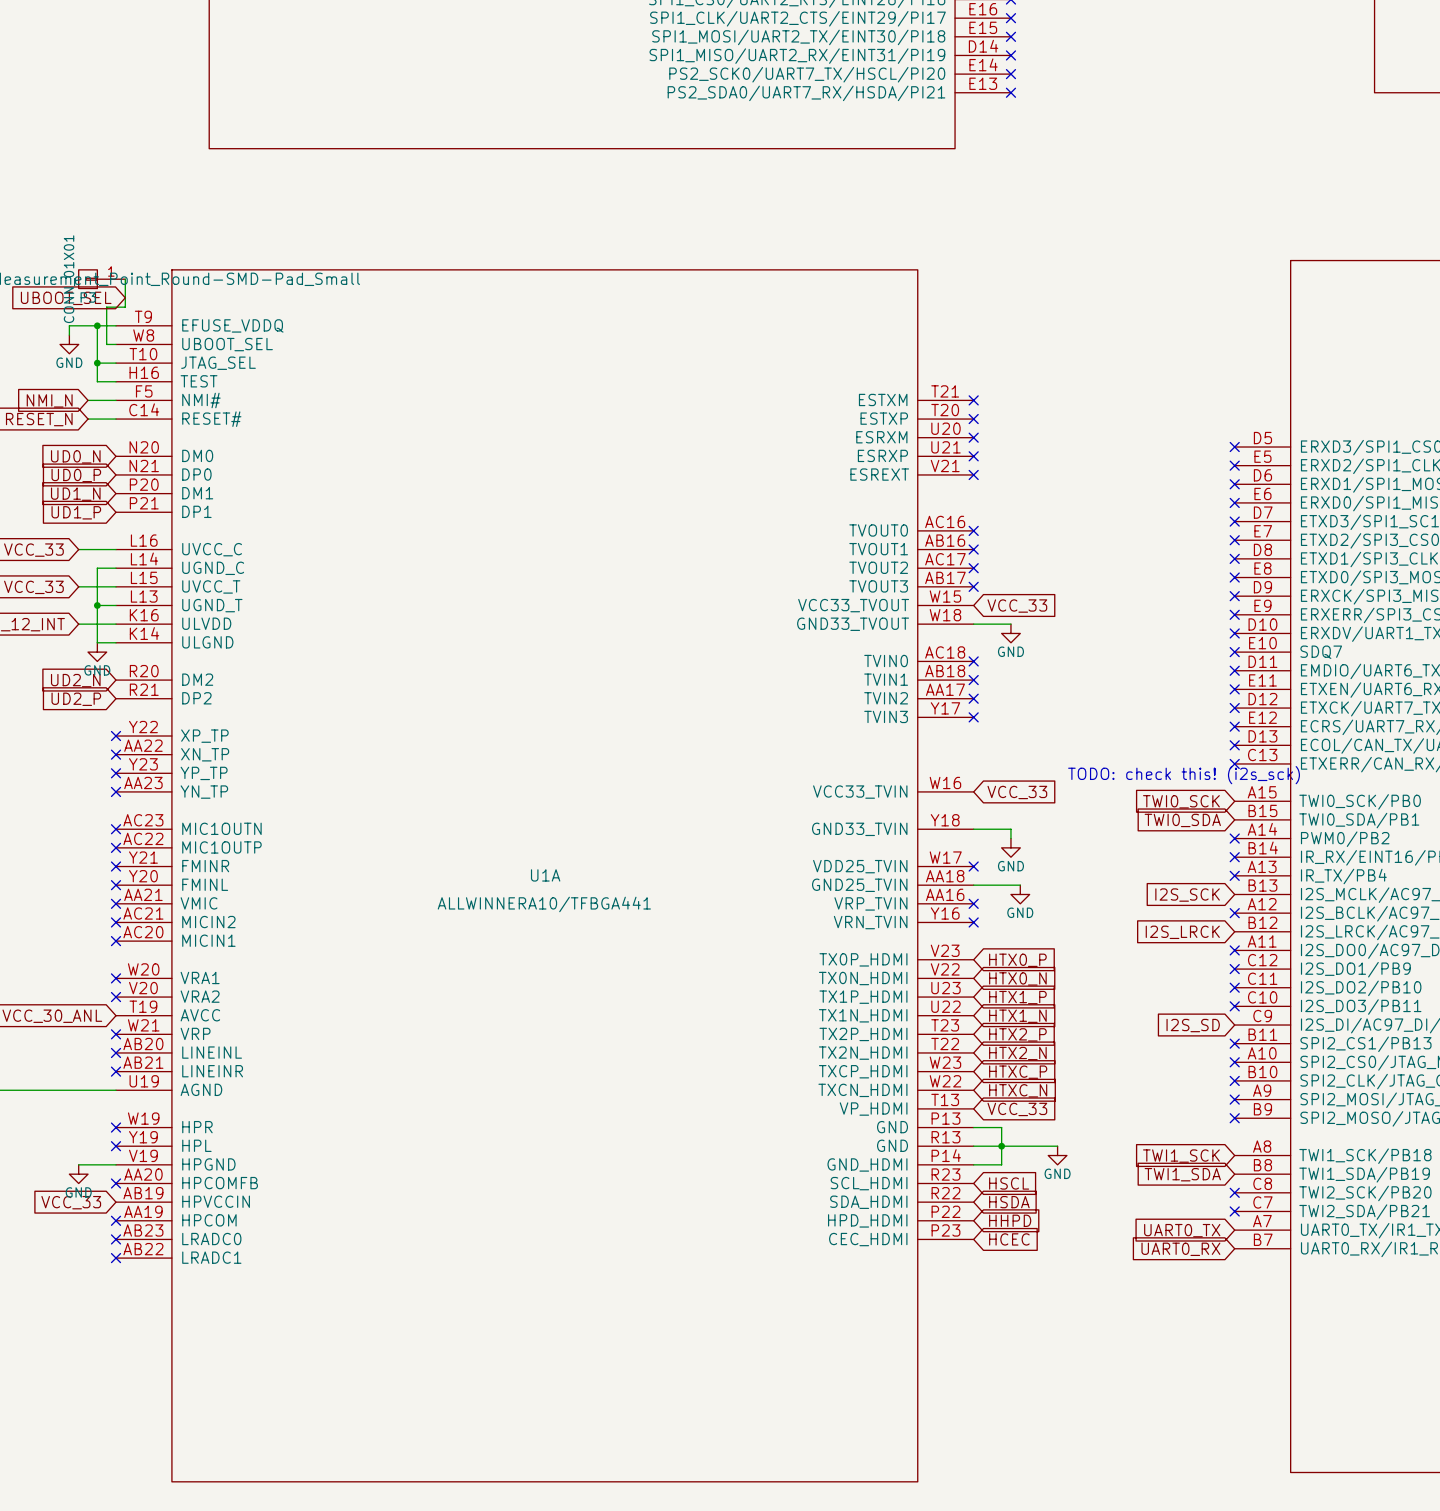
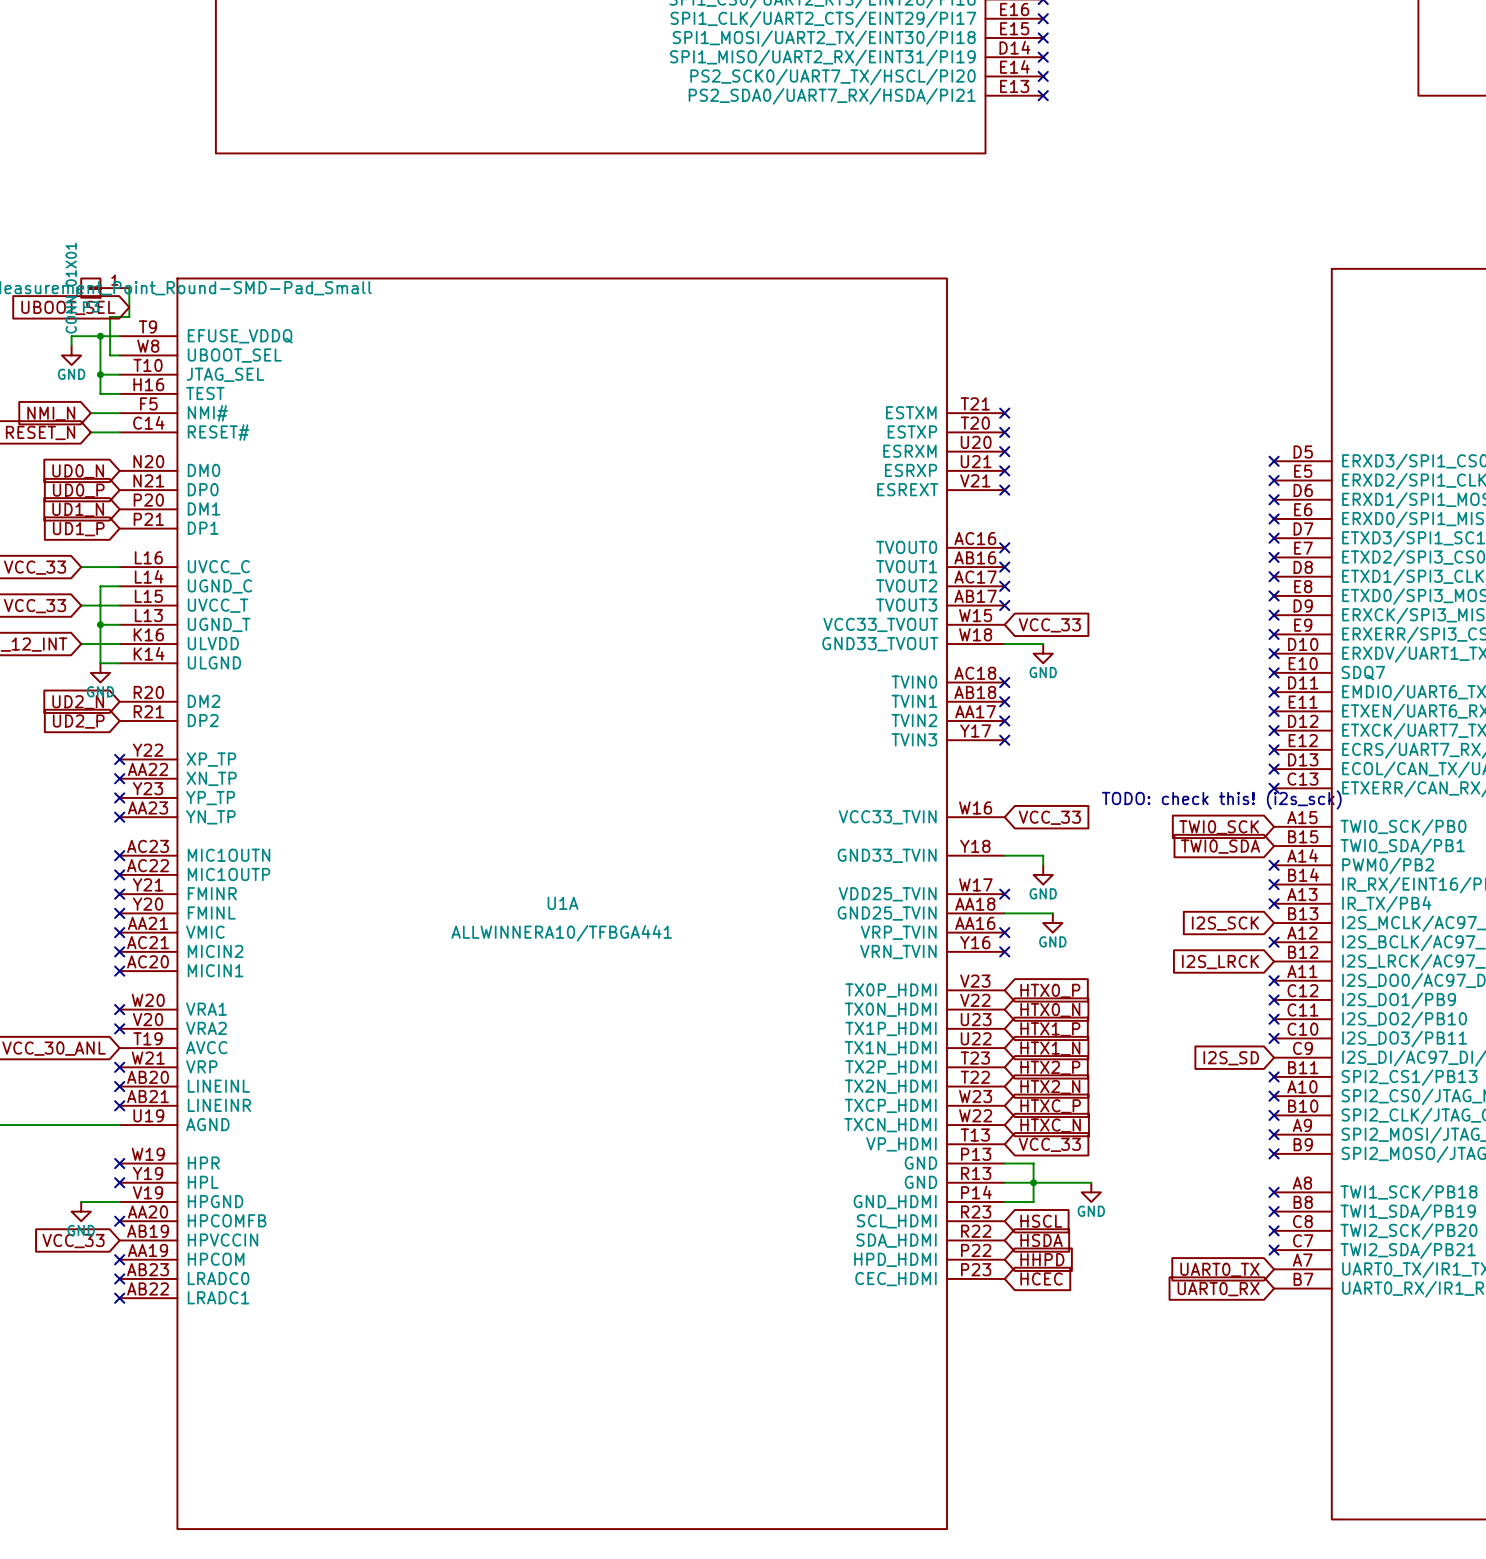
no-connect mark: none -> (1274, 1192)
global label: TWI1_SCK (1181, 1156) -> none
global label: TWI1_SDA (1182, 1174) -> none
no-connect mark: none -> (1274, 1211)

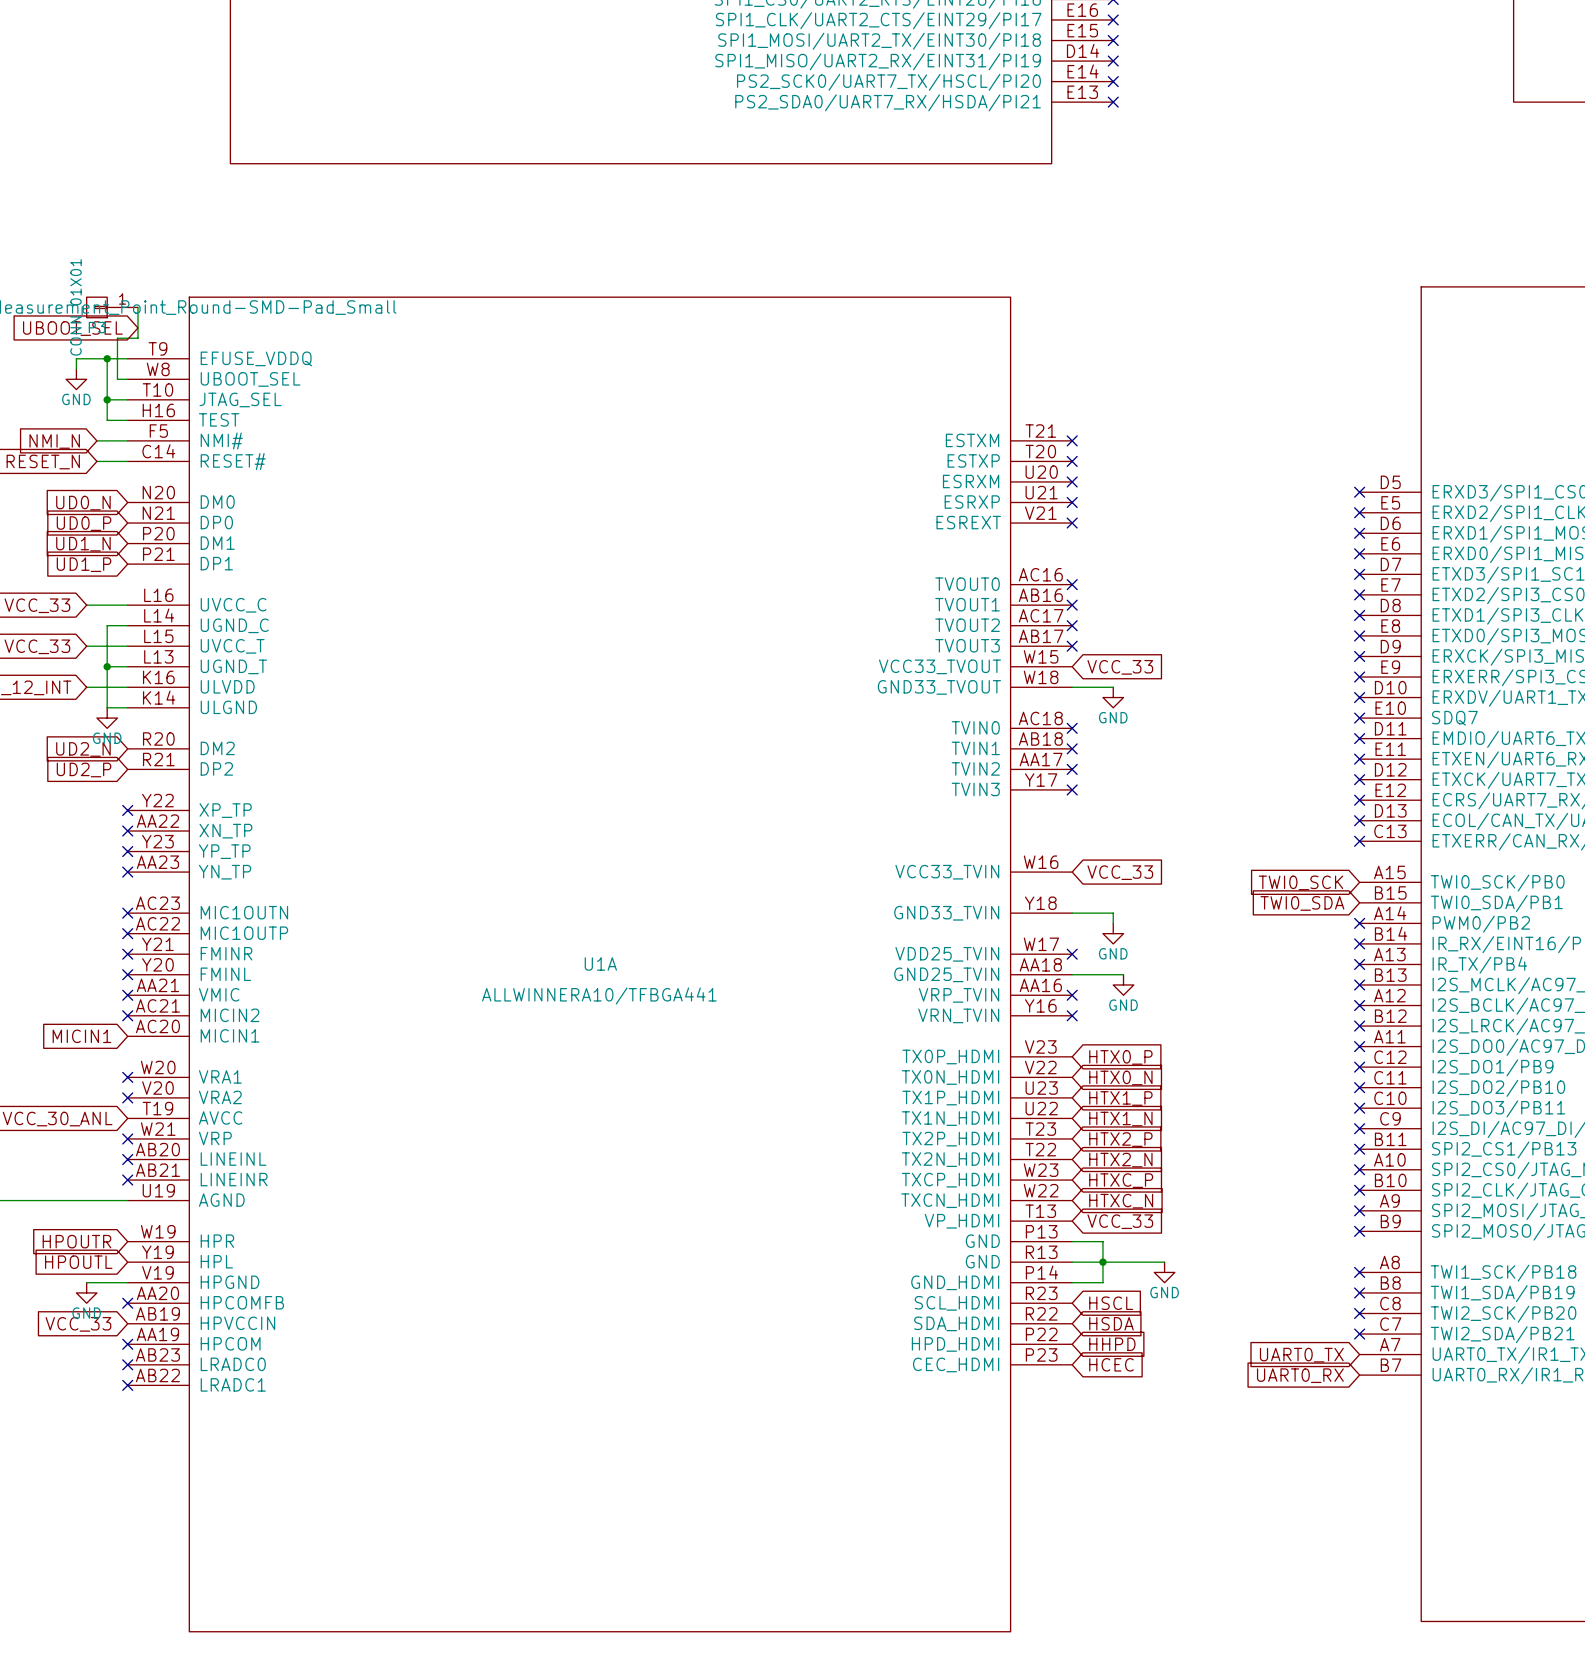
text: TODO: check this! (i2s_sck) (1221, 799) -> none
global label: I2S_SCK (1225, 923) -> none
no-connect mark: none -> (1359, 984)
no-connect mark: none -> (1359, 1026)
global label: I2S_LRCK (1220, 962) -> none
global label: none -> MICIN1 (81, 1036)
no-connect mark: (119, 971) -> none
no-connect mark: none -> (1359, 1128)
global label: I2S_SD (1231, 1058) -> none
global label: none -> HPOUTR (76, 1241)
no-connect mark: (119, 1163) -> none
global label: none -> HPOUTL (78, 1262)
no-connect mark: (119, 1182) -> none

